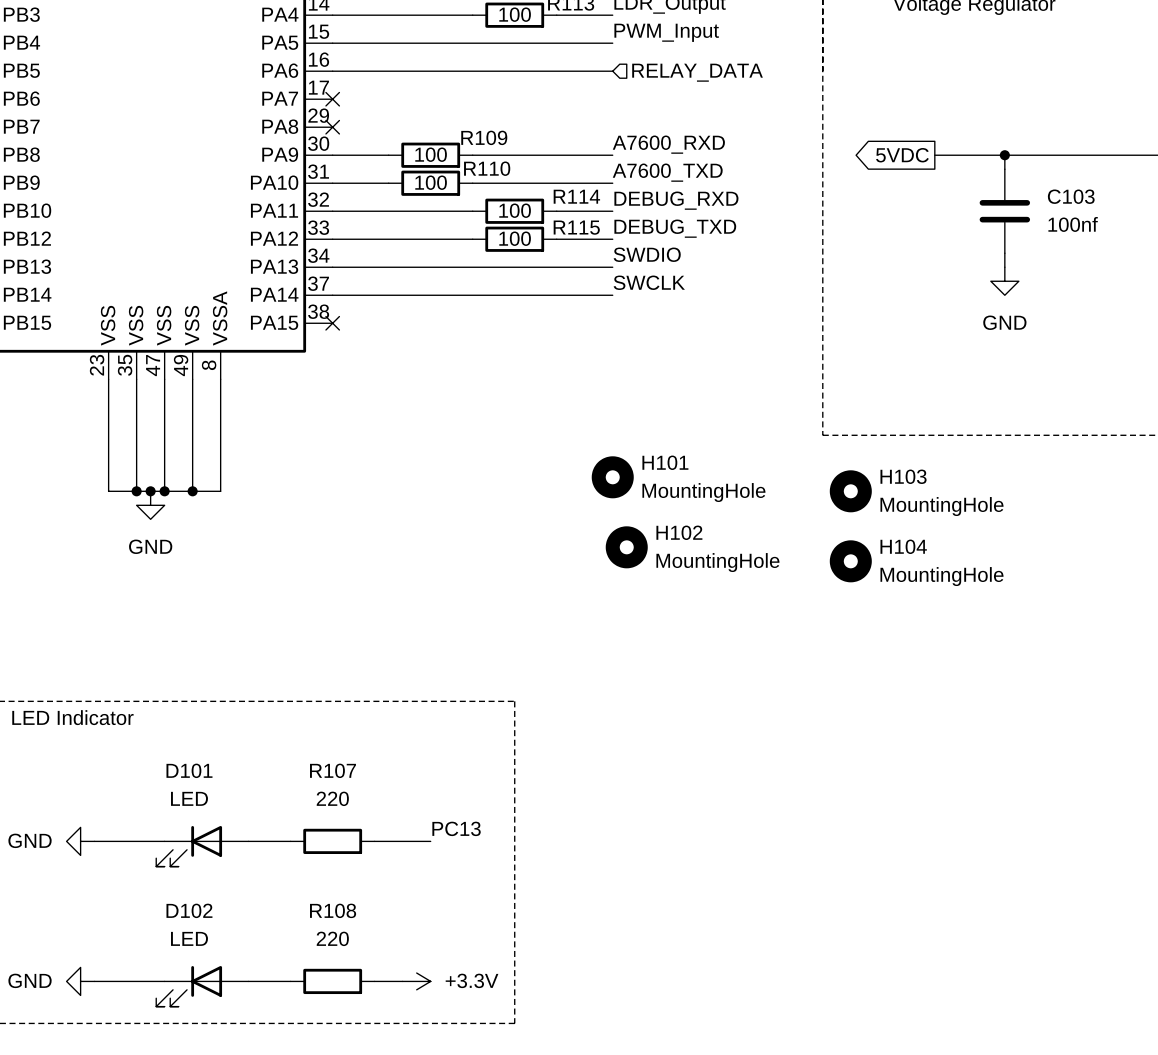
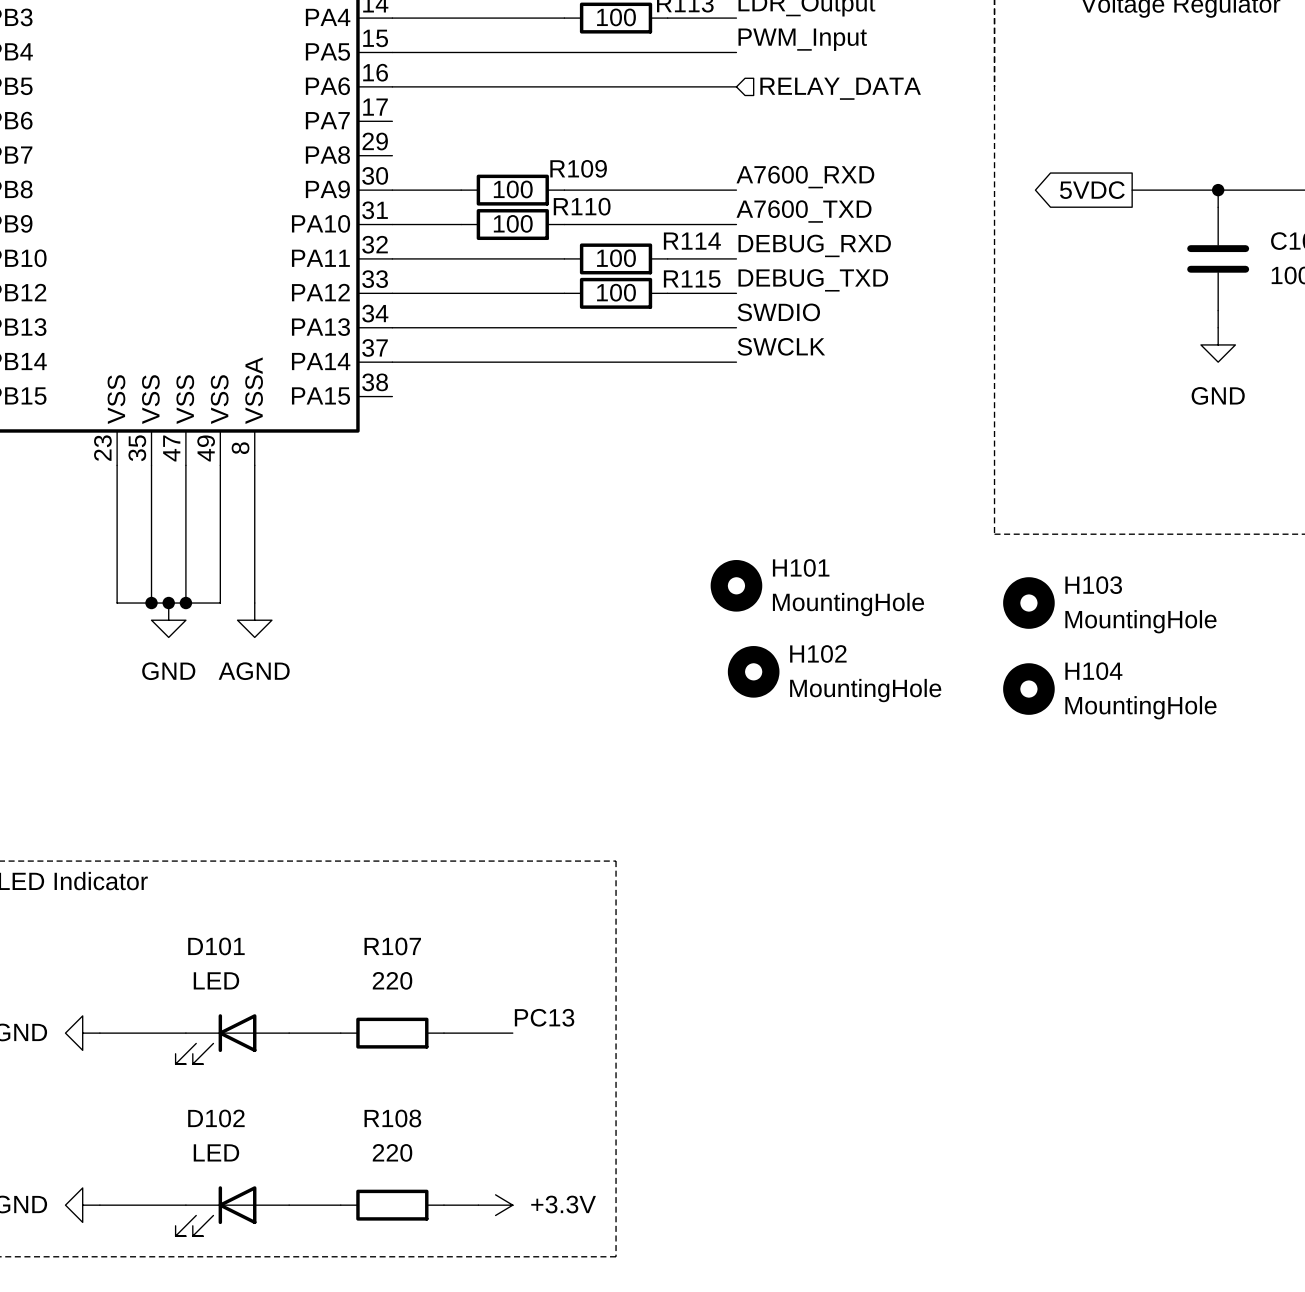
no-connect mark: (332, 99) -> none
no-connect mark: (332, 127) -> none
no-connect mark: (332, 323) -> none
wire: (192, 491) (220, 491) -> none
junction: (192, 491) -> none
power symbol: none -> AGND (254, 620)

